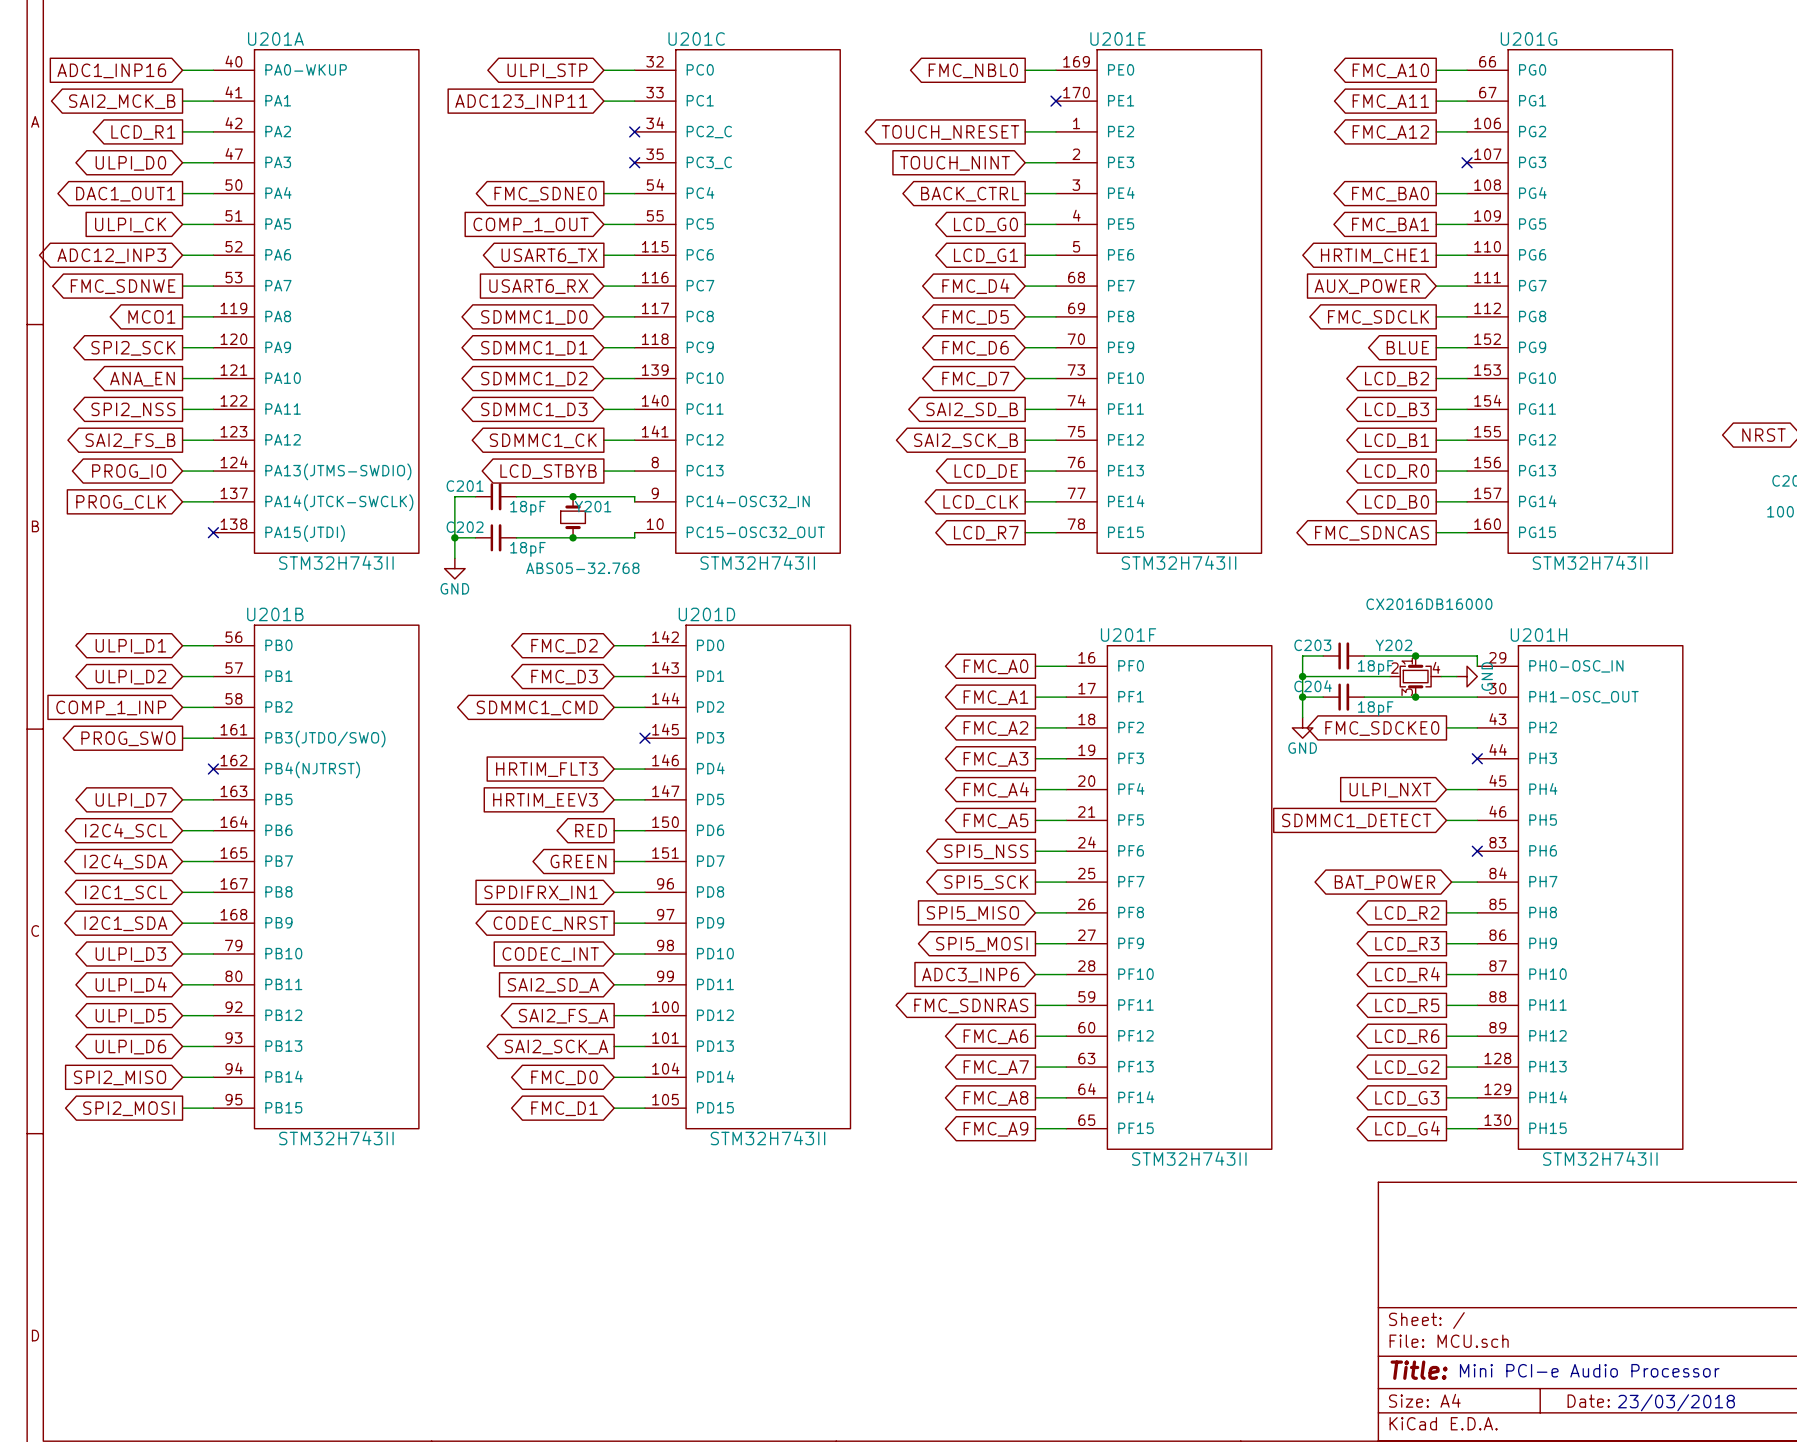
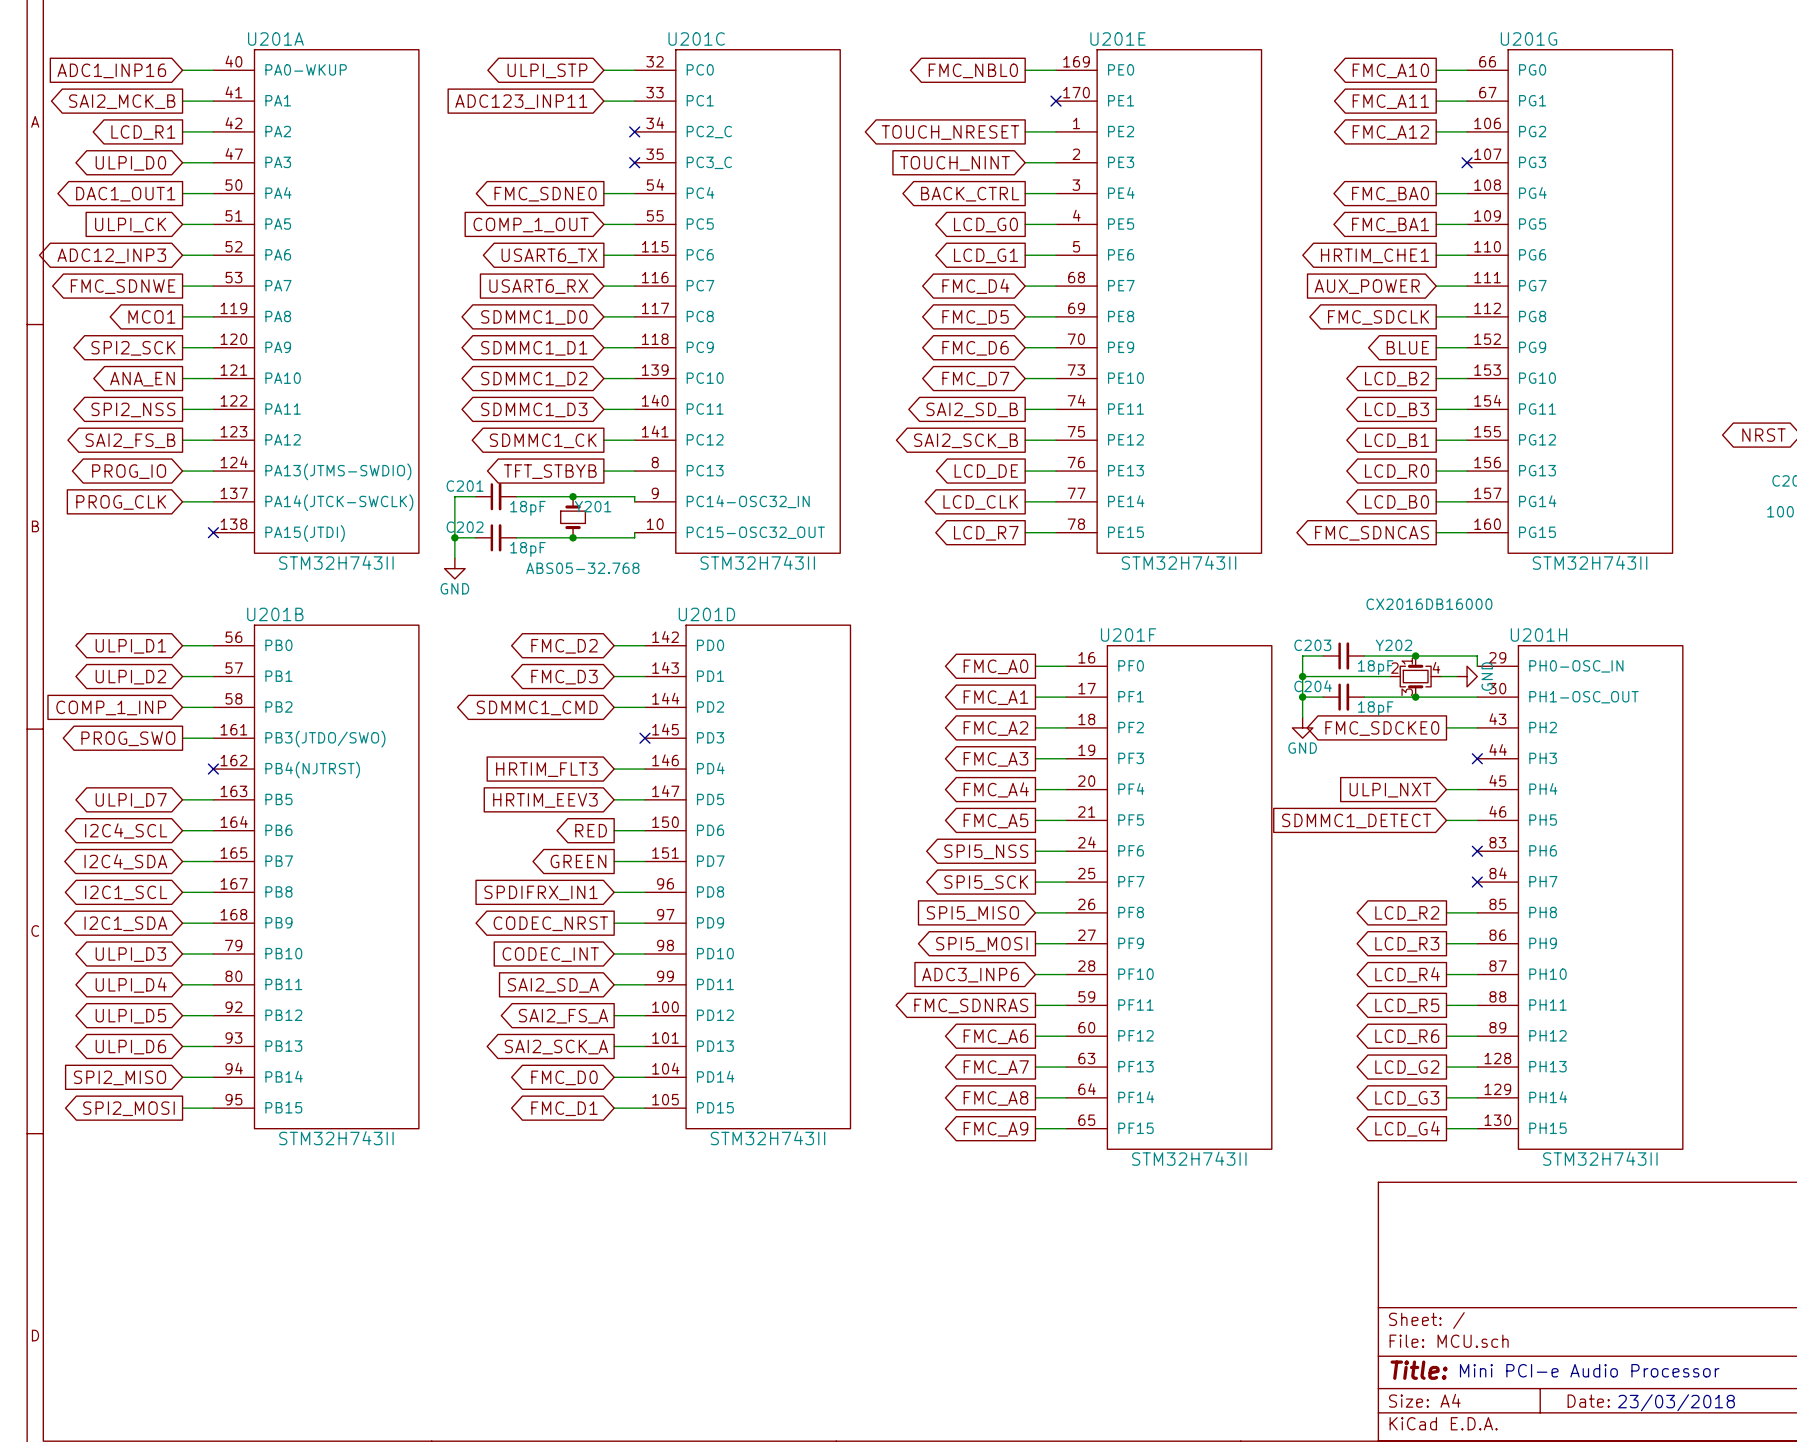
global label: LCD_STBYB (548, 471) -> TFT_STBYB (550, 471)
global label: BAT_POWER (1384, 882) -> none
wire: (1451, 882) (1477, 882) -> none
no-connect mark: none -> (1477, 882)

